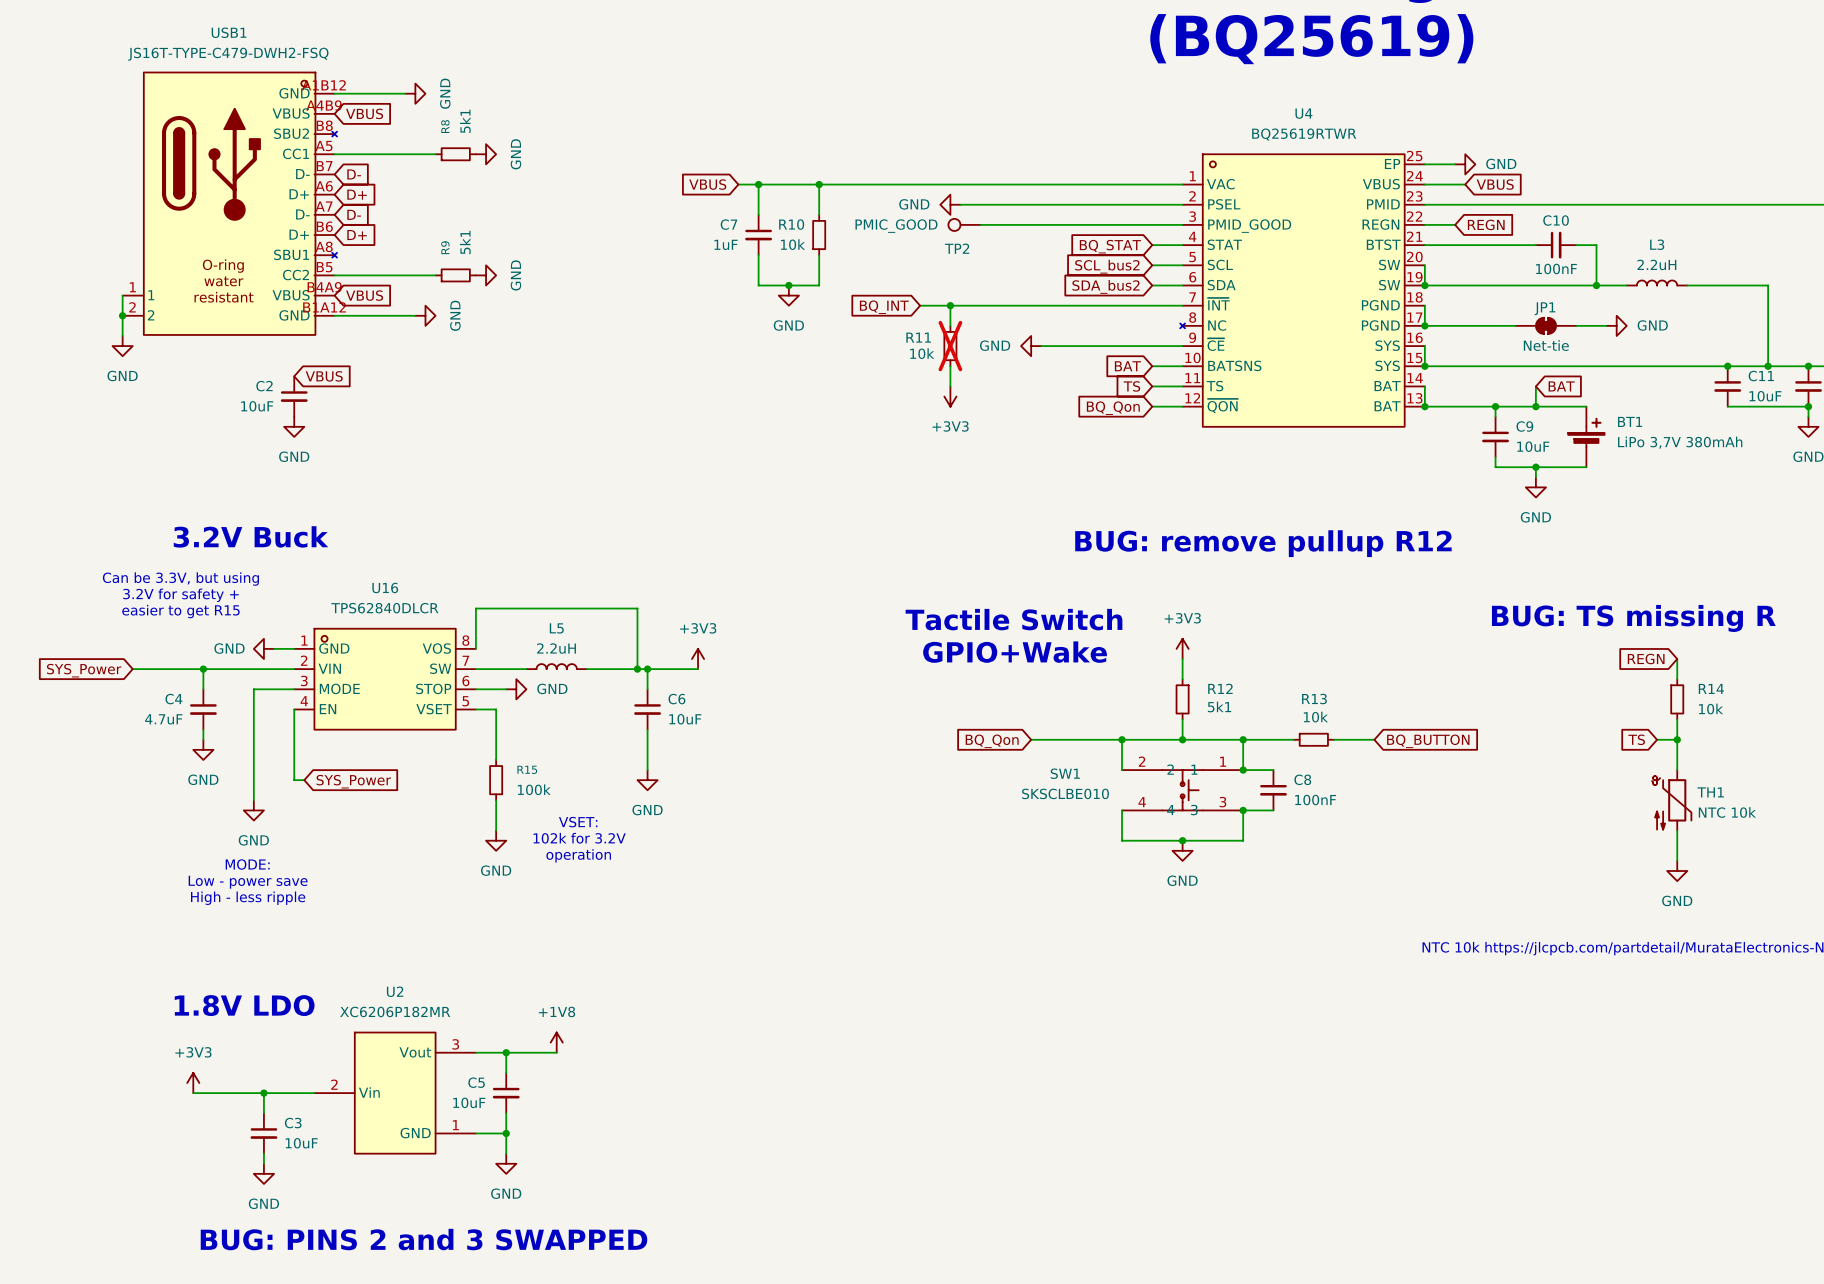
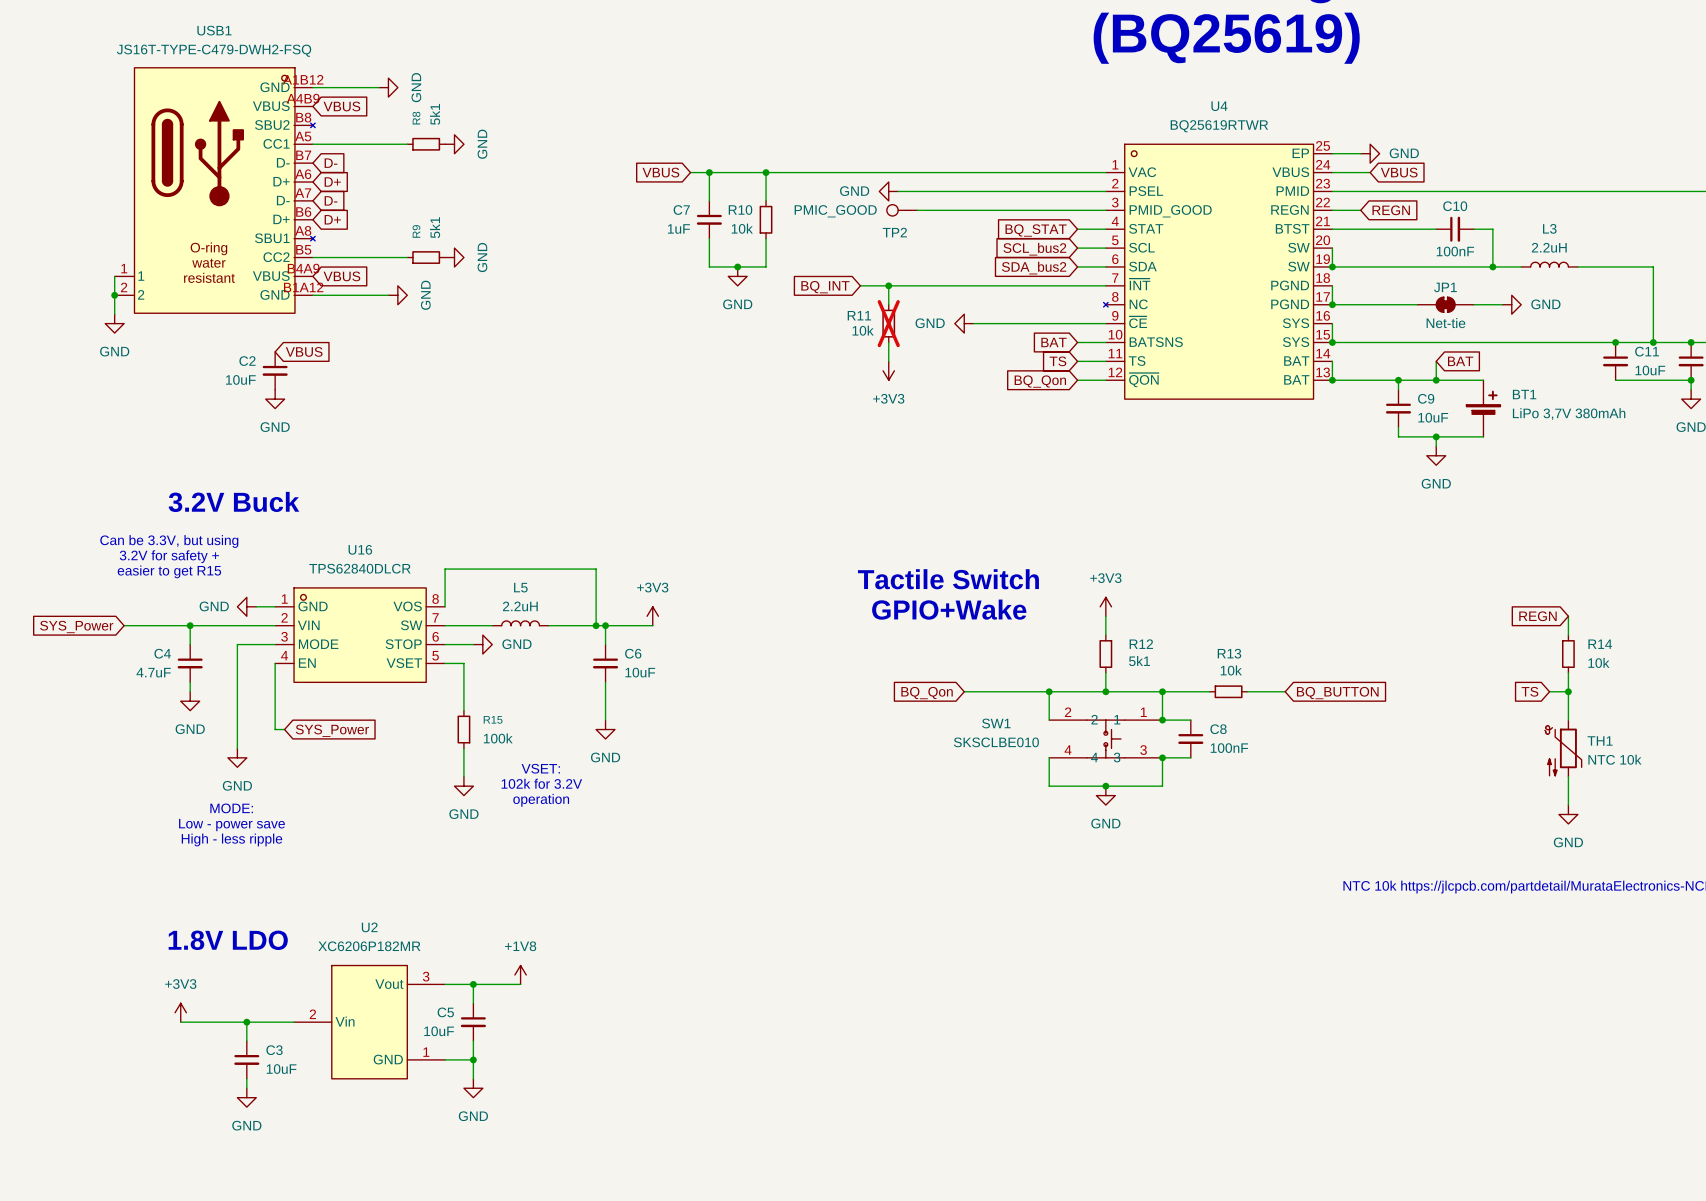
text: BUG: remove pullup R12 (1263, 543) -> none
text: BUG: TS missing R (1633, 618) -> none
text: BUG: PINS 2 and 3 SWAPPED (424, 1239) -> none

